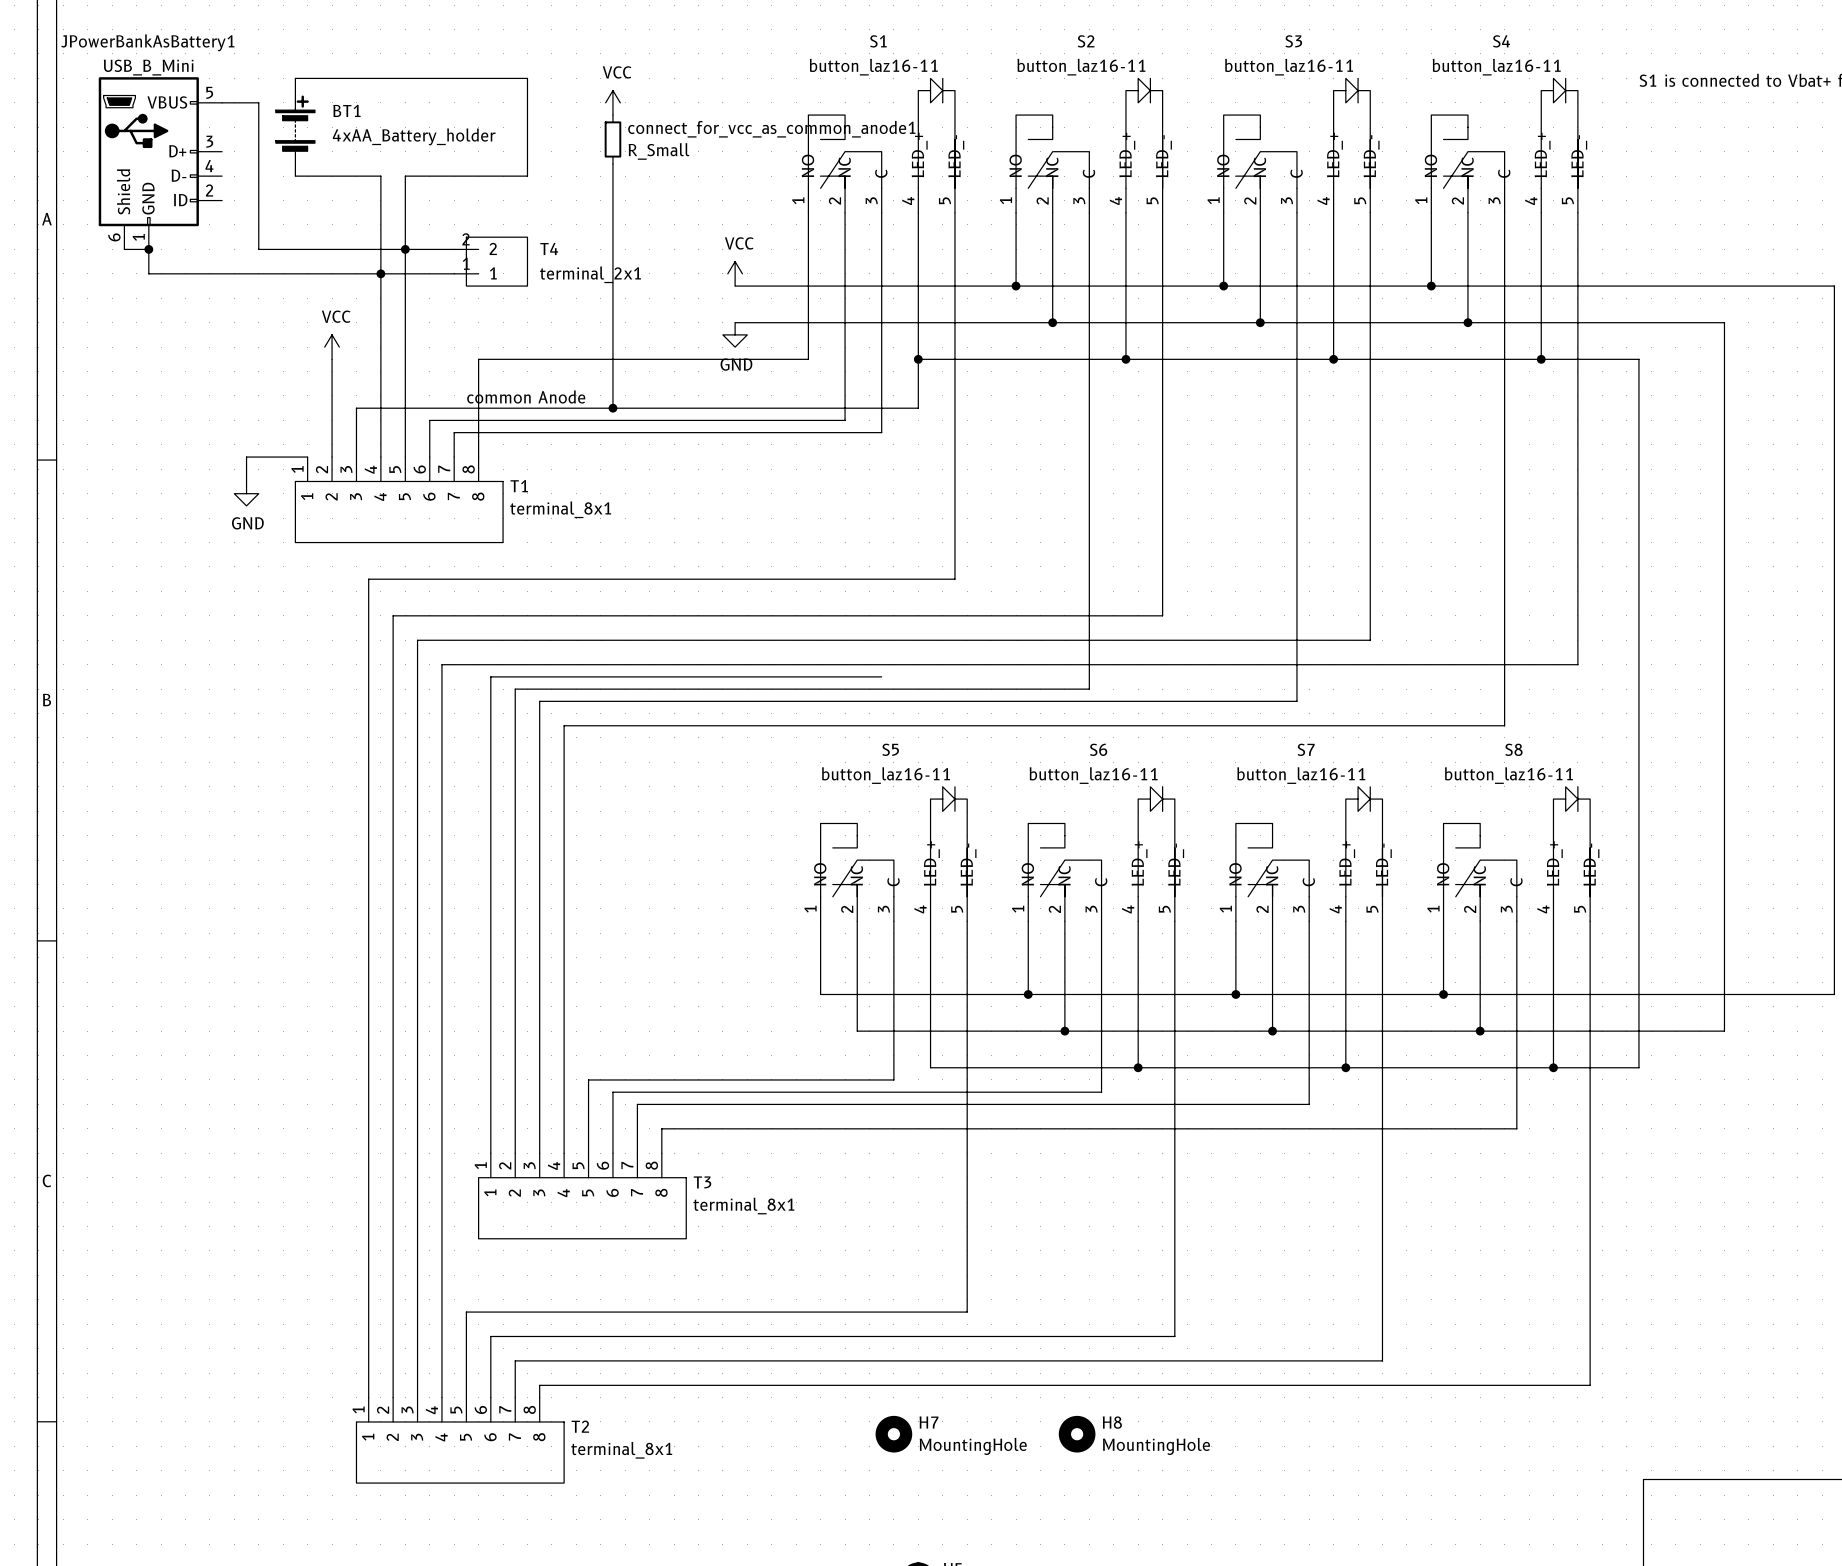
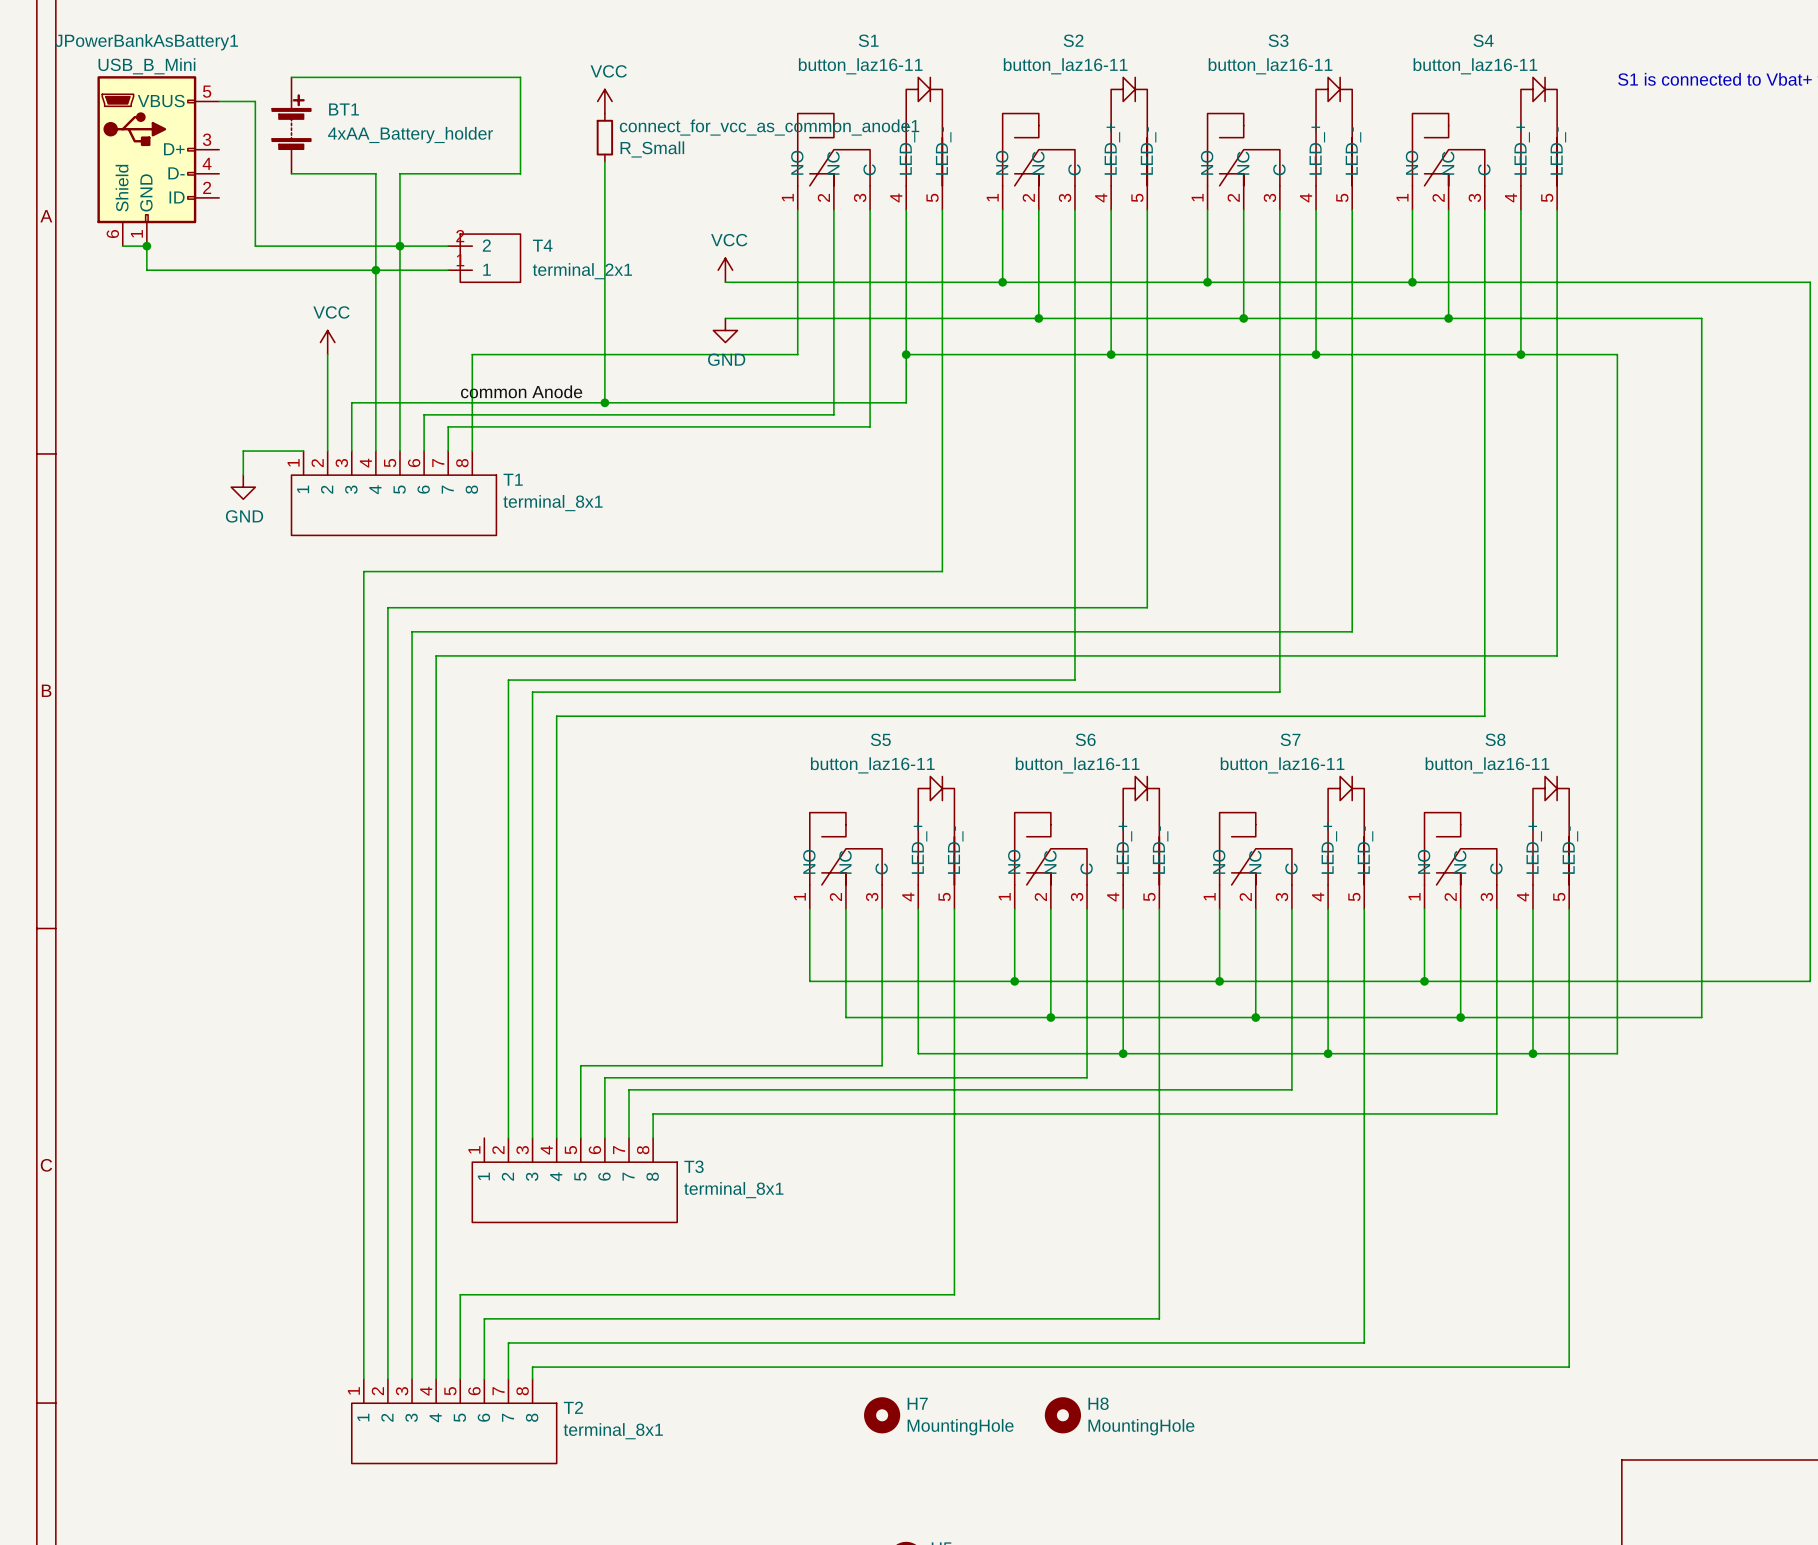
wire: (881, 676) (490, 676) (490, 1153) -> none

